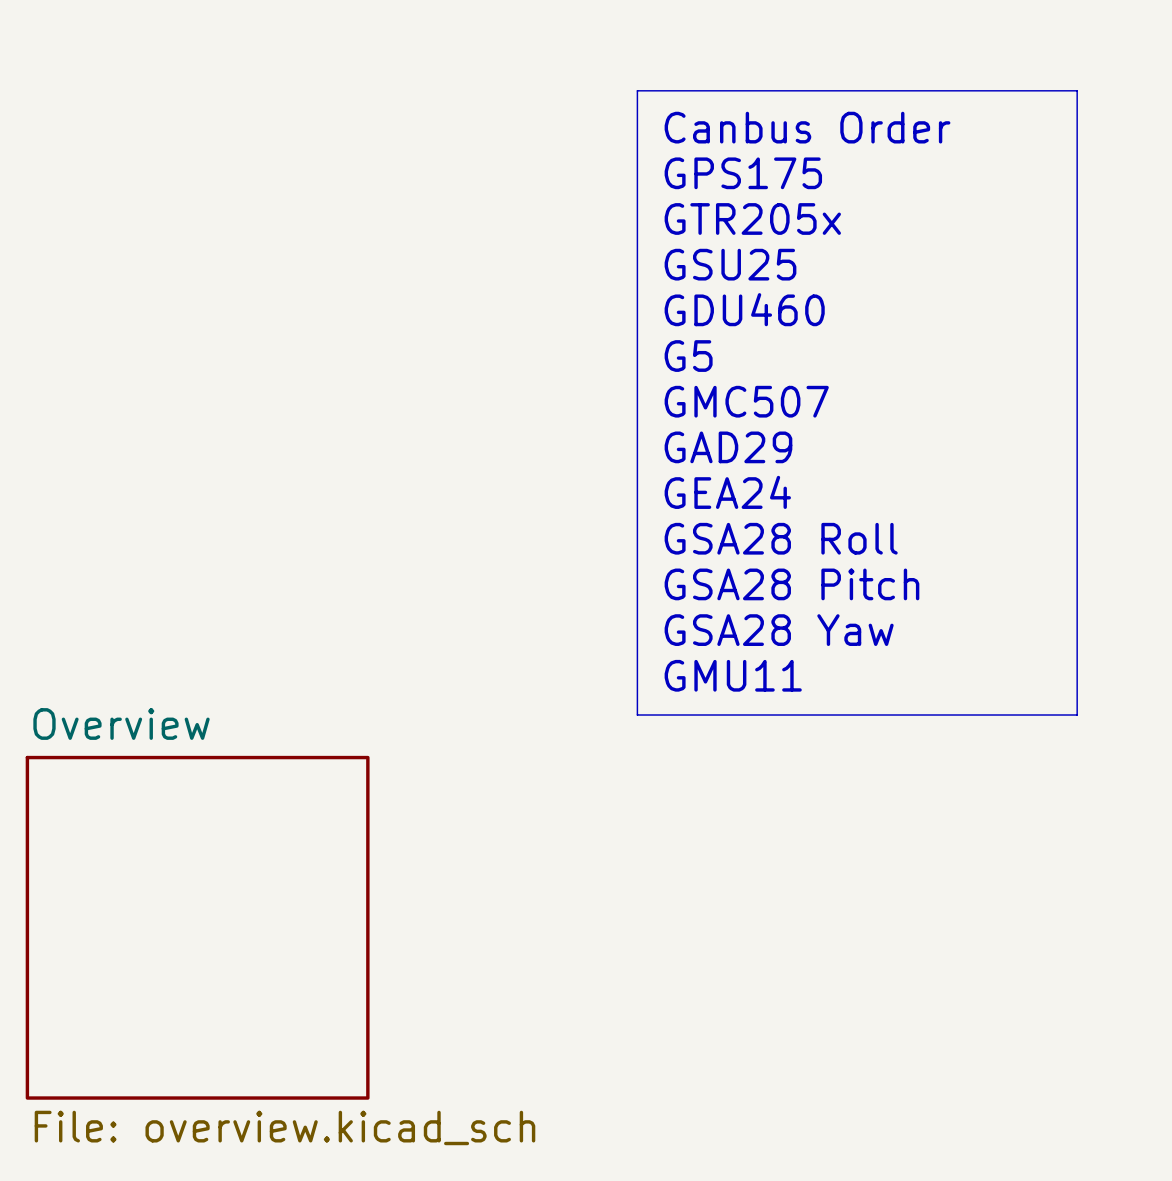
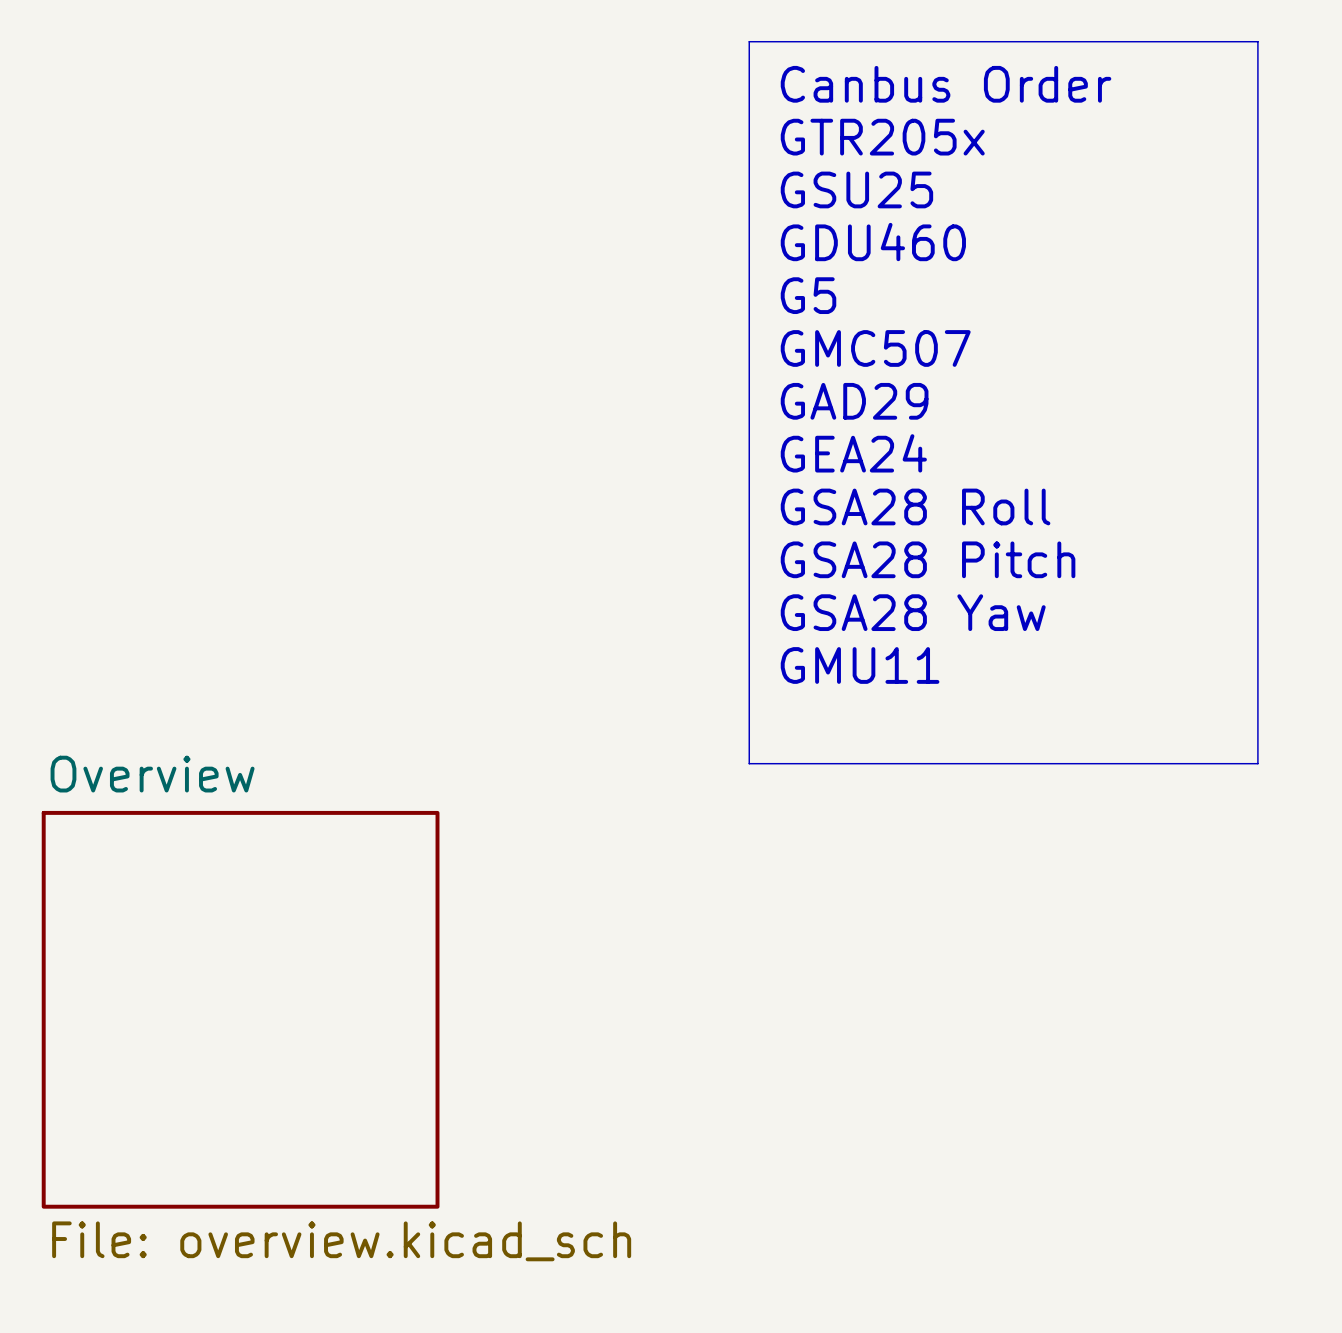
text: GPS175 (743, 173) -> GTR205x (882, 137)
text: GTR205x (752, 218) -> GSU25 (856, 189)
text: GSU25 (730, 264) -> GDU460 (873, 242)
text: GDU460 (744, 309) -> G5 (808, 295)
text: G5 (688, 356) -> GMC507 (875, 348)
text: GMC507 (746, 401) -> GAD29 (854, 401)
text: GAD29 (728, 447) -> GEA24 (853, 453)
text: GEA24 (727, 492) -> GSA28 Roll (915, 506)
text: GSA28 Roll (781, 538) -> GSA28 Pitch (928, 559)
text: GSA28 Pitch (791, 584) -> GSA28 Yaw (913, 612)
text: GSA28 Yaw (779, 630) -> GMU11 (860, 665)
text: GMU11 (733, 675) -> none

